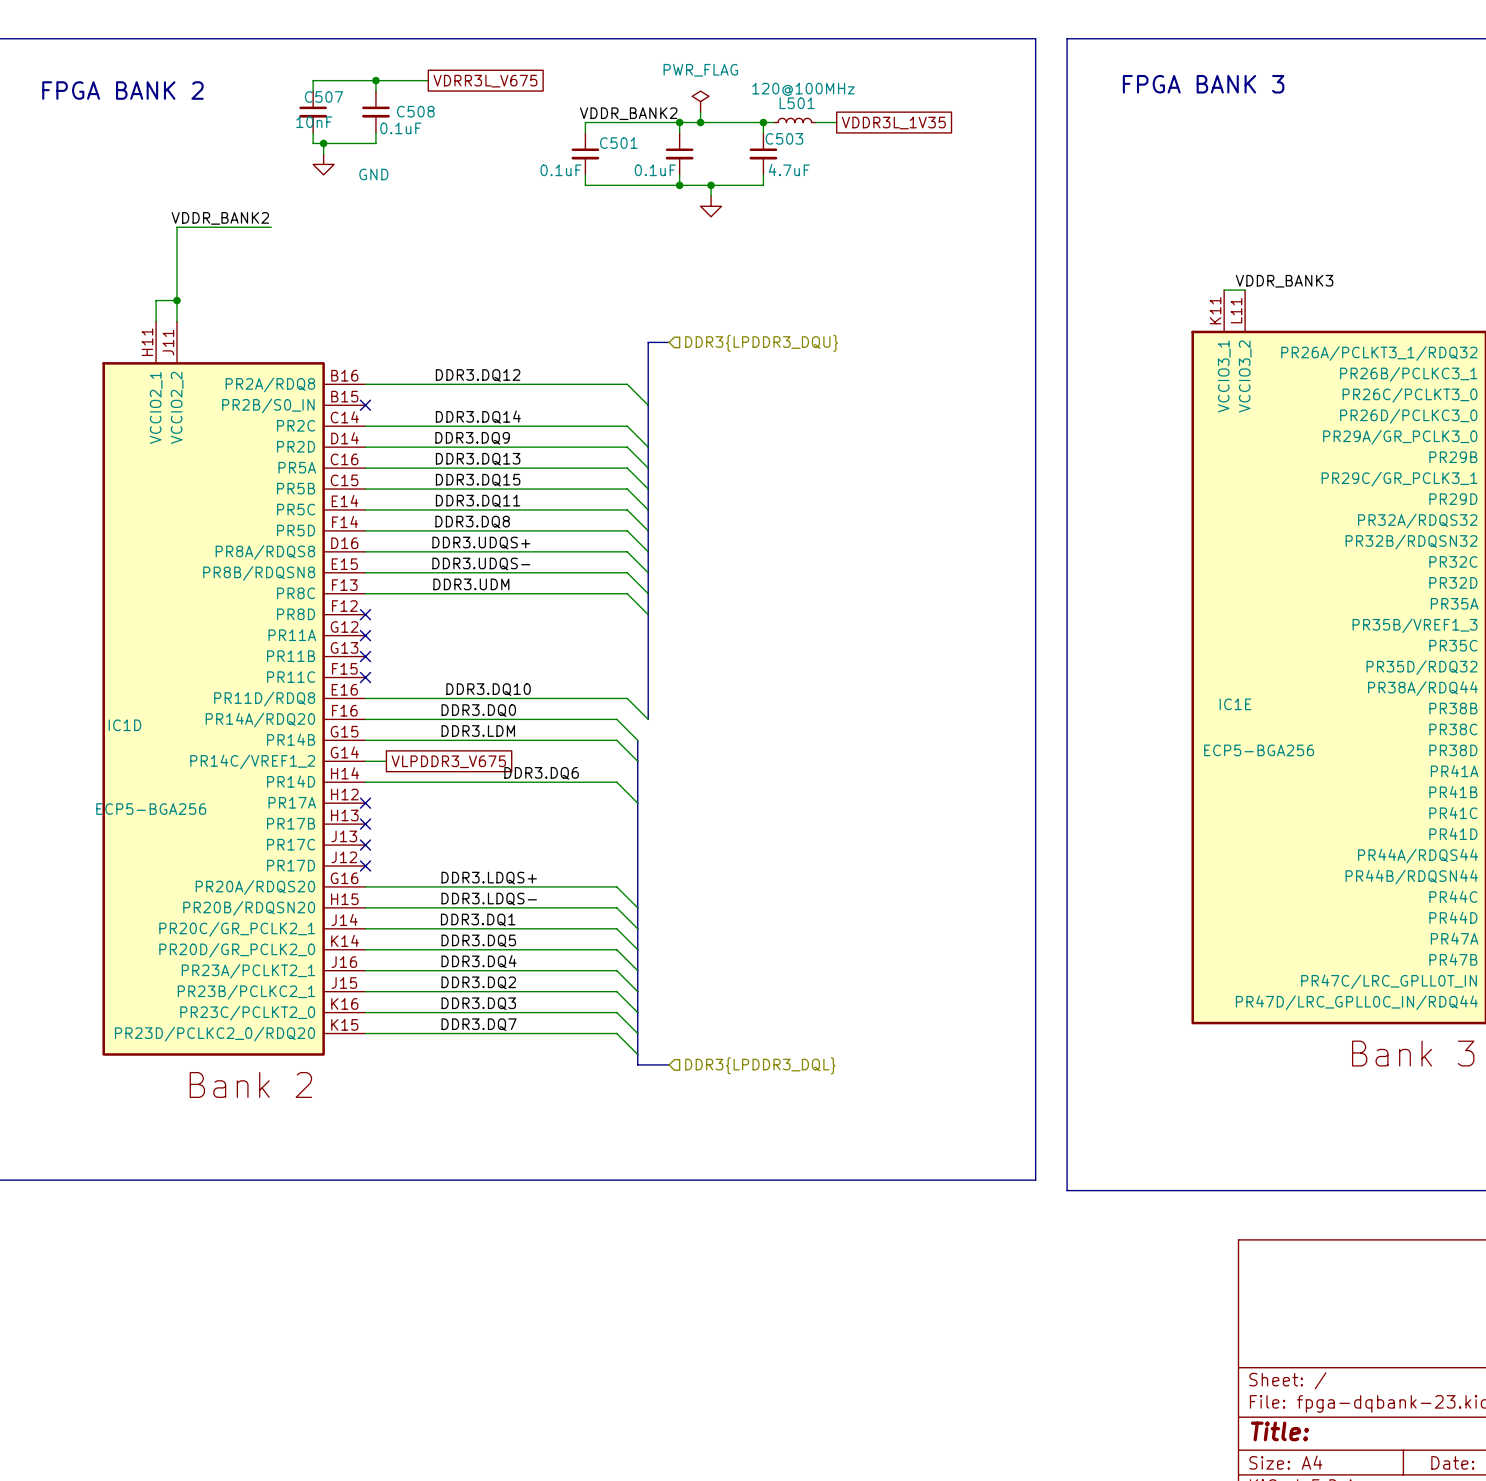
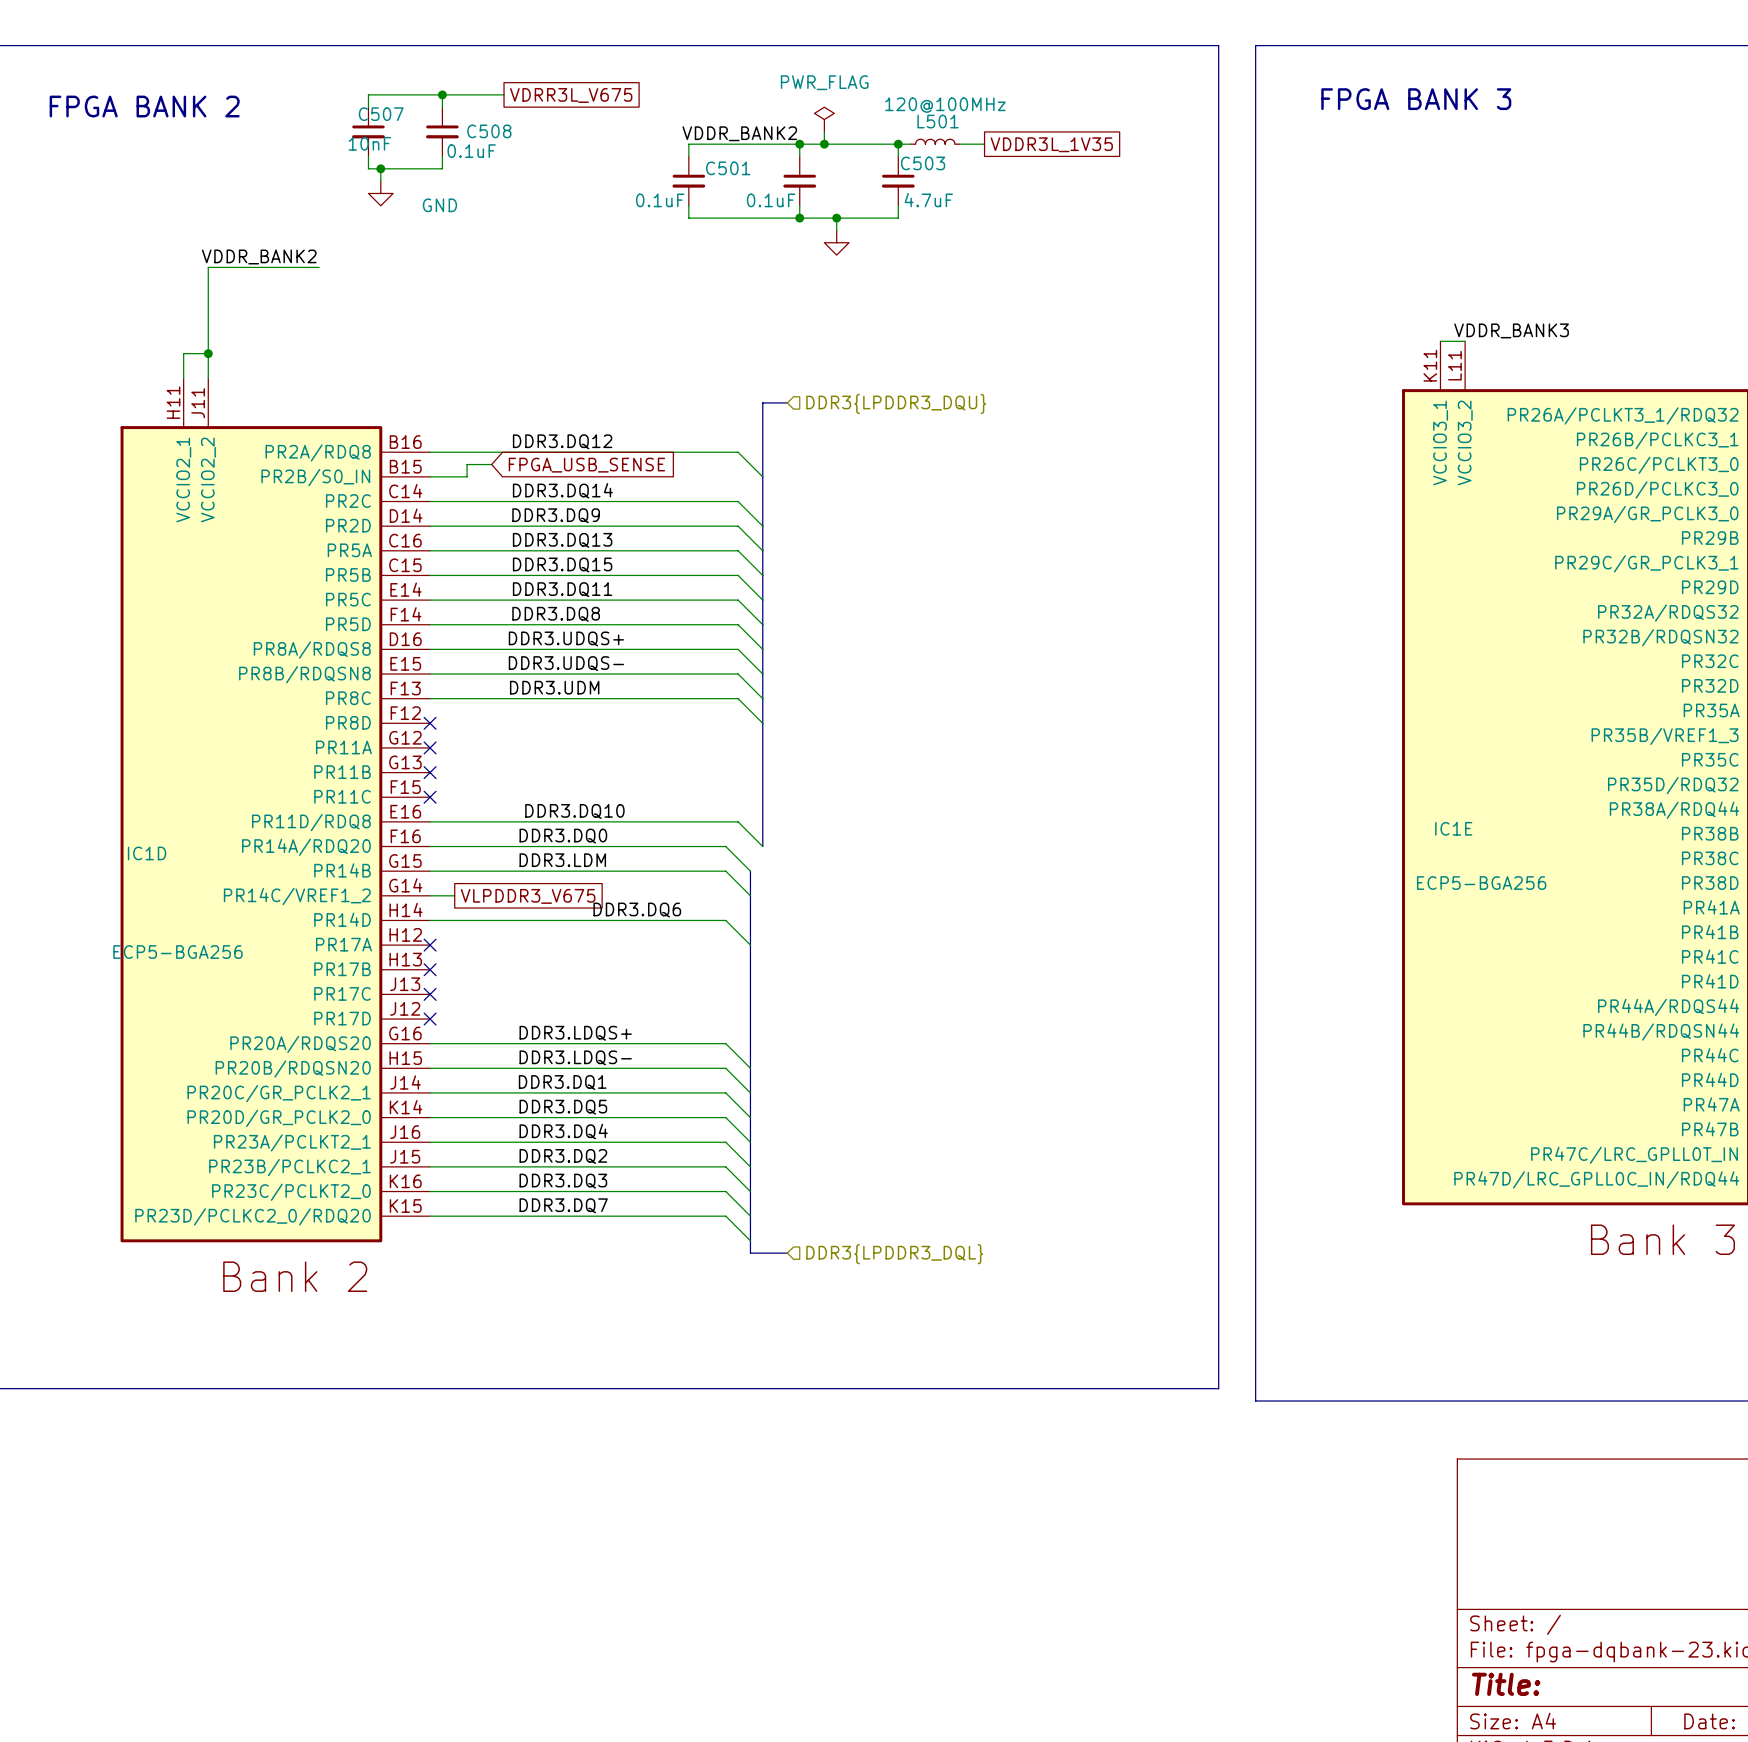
wire: none -> (491, 464) (467, 464) (467, 476) (430, 476)
global label: none -> FPGA_USB_SENSE (586, 465)
no-connect mark: (365, 405) -> none

